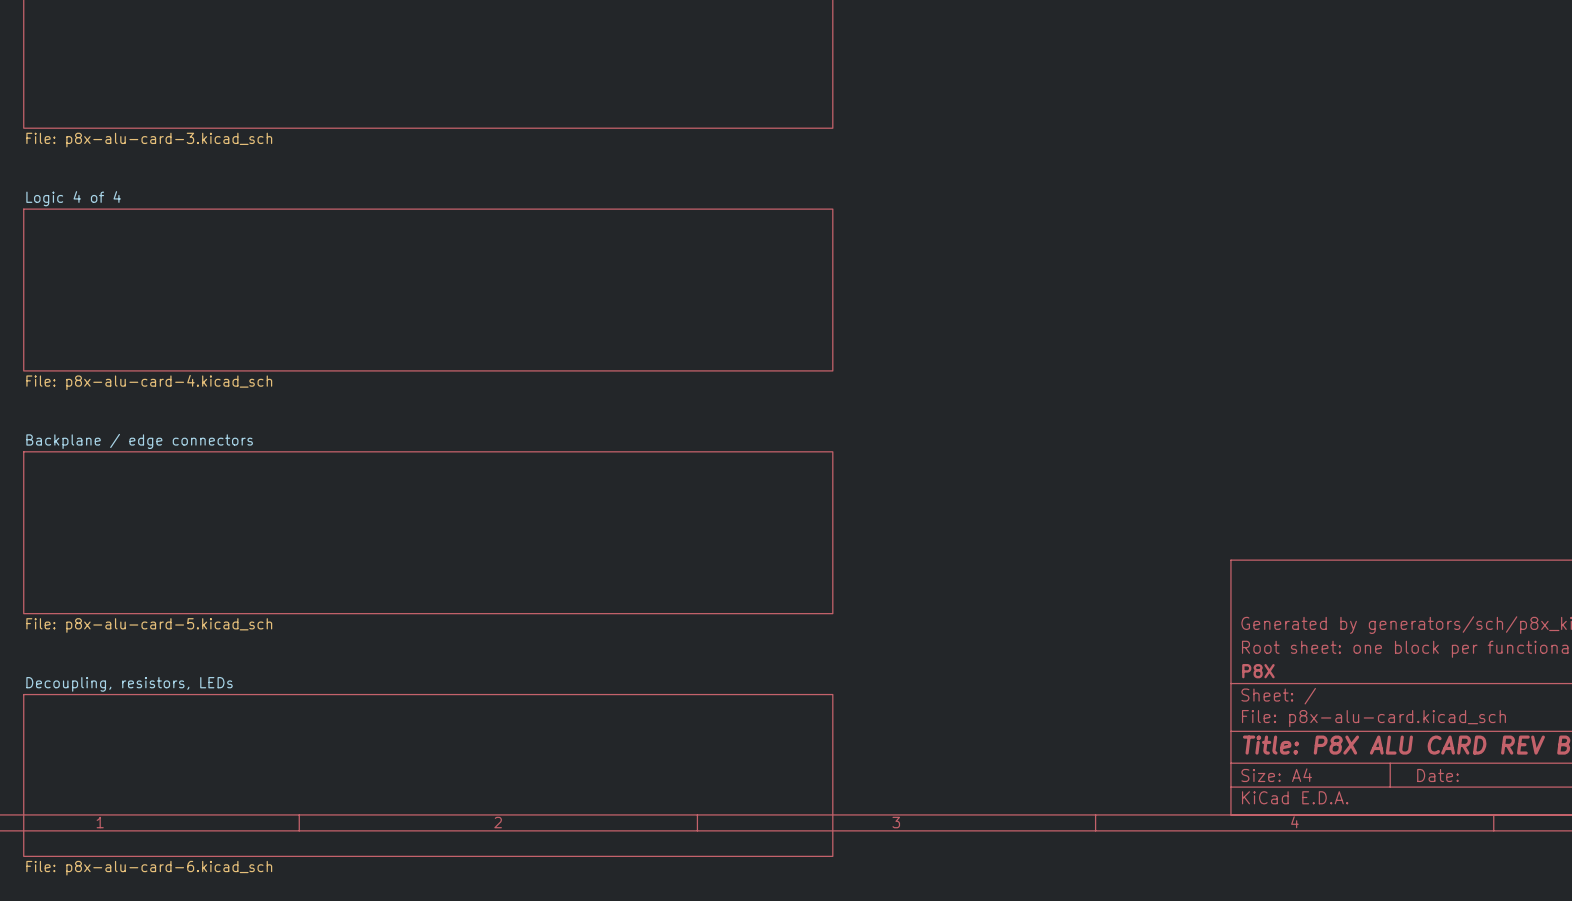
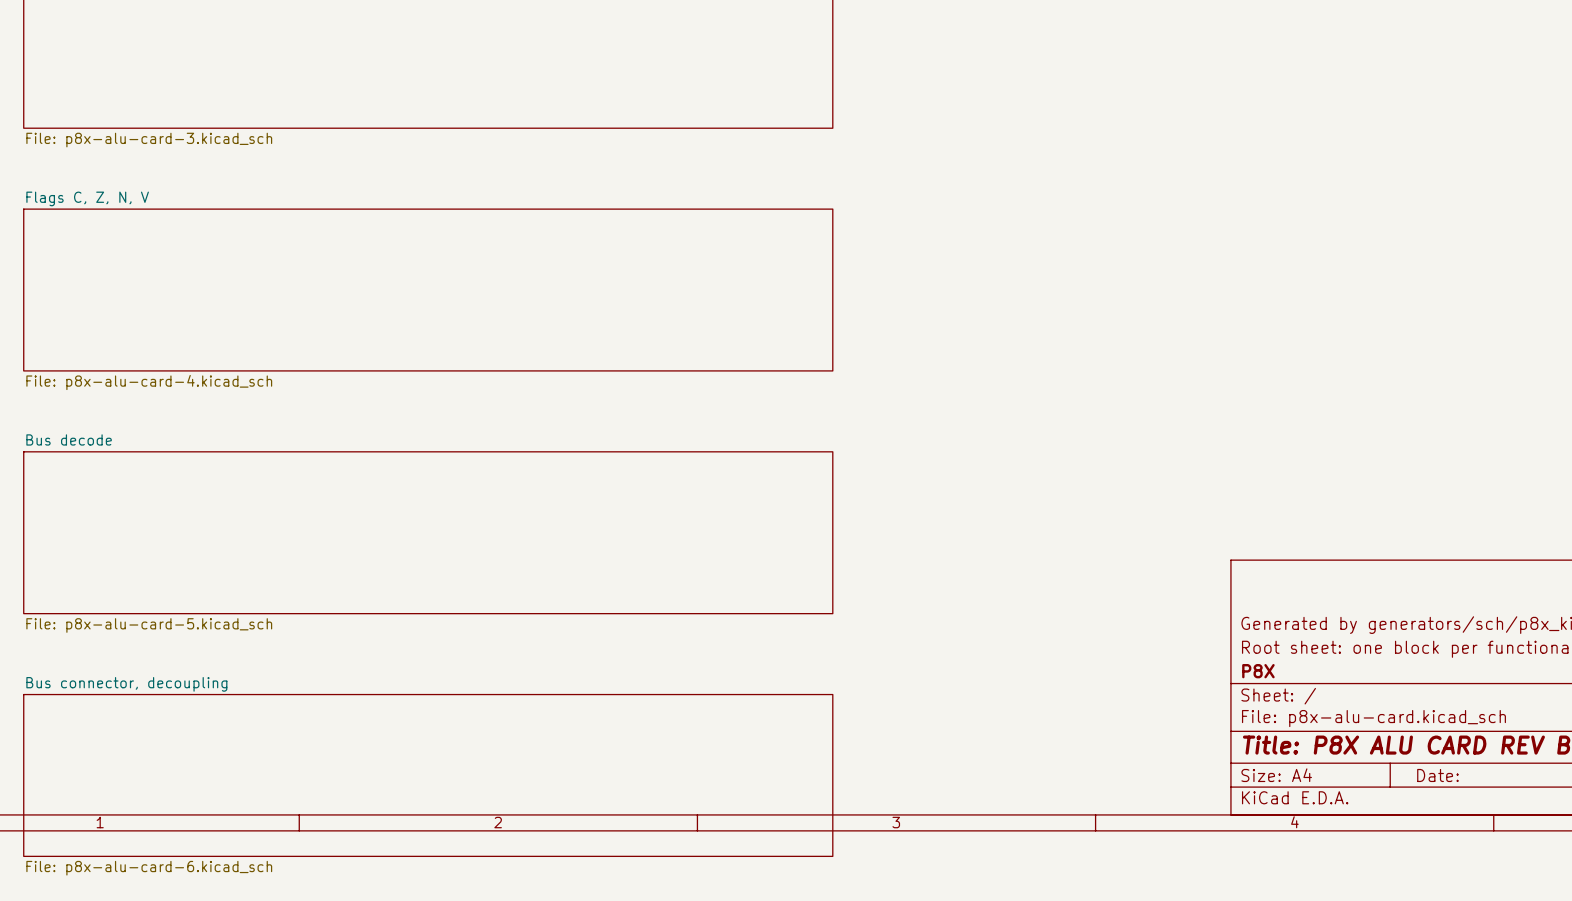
sheet Logic 4 of 4 name: Logic 4 of 4 (73, 198) -> Flags C, Z, N, V (87, 198)
sheet Backplane / edge connectors name: Backplane / edge connectors (139, 441) -> Bus decode (69, 439)
sheet Decoupling, resistors, LEDs name: Decoupling, resistors, LEDs (129, 684) -> Bus connector, decoupling (126, 684)

